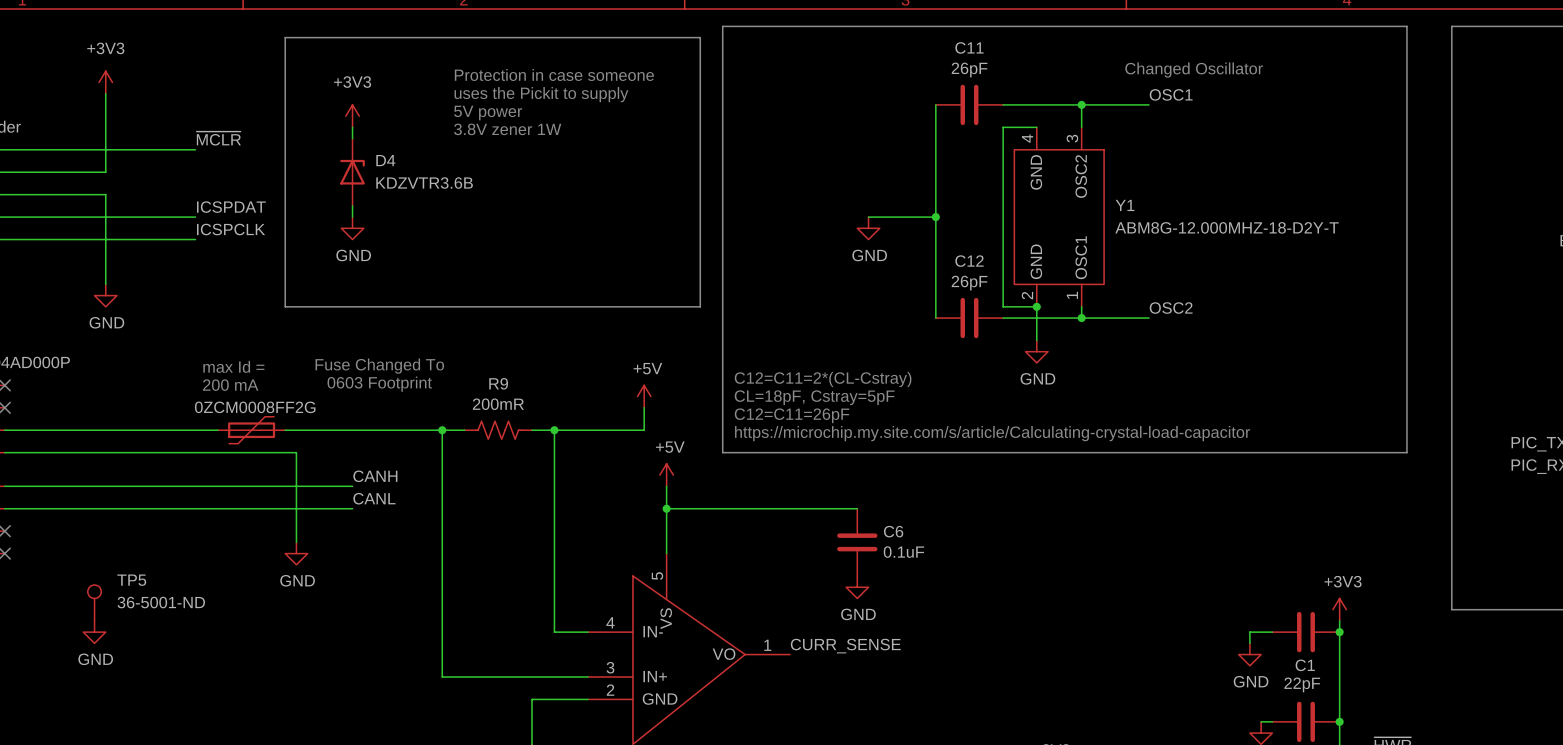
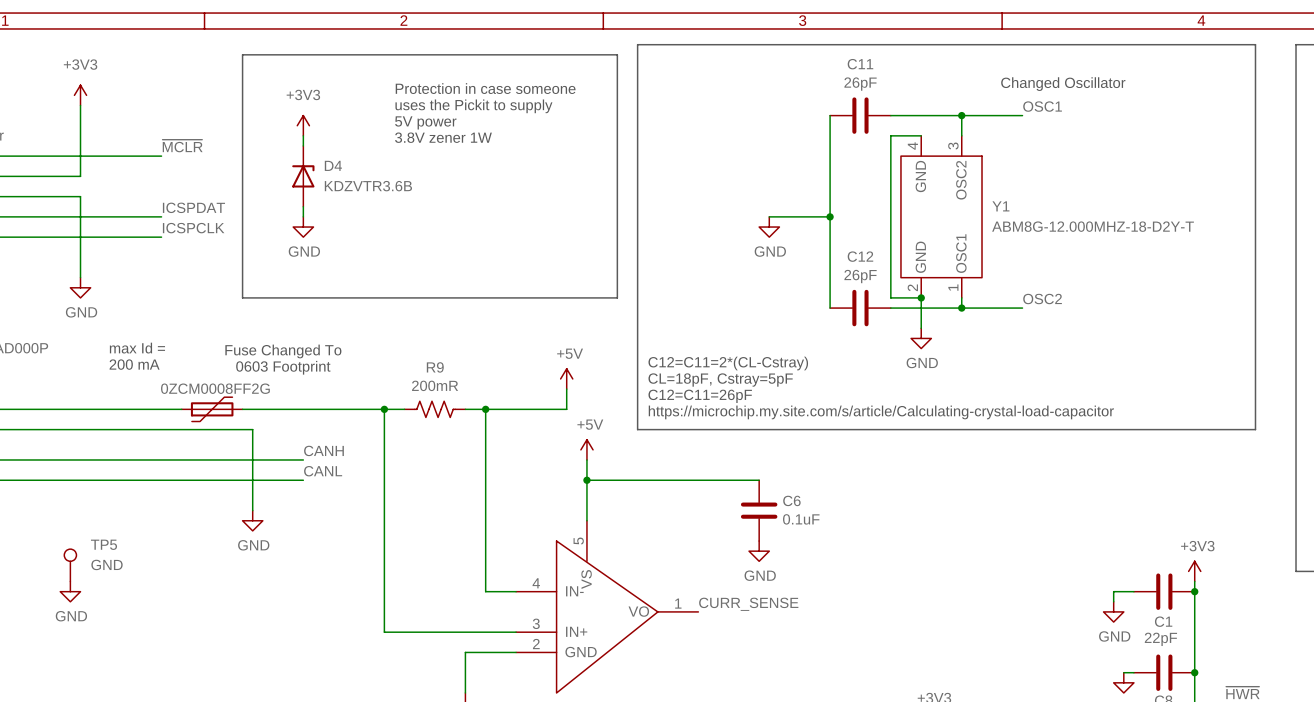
text position: max Id = (233, 366) -> max Id = (137, 348)
text position: Fuse Changed To (379, 366) -> Fuse Changed To (283, 351)
text position: 0603 Footprint (379, 384) -> 0603 Footprint (283, 367)
text position: 200 mA (230, 385) -> 200 mA (134, 364)
TP5 value: 36-5001-ND (161, 602) -> GND (107, 564)

